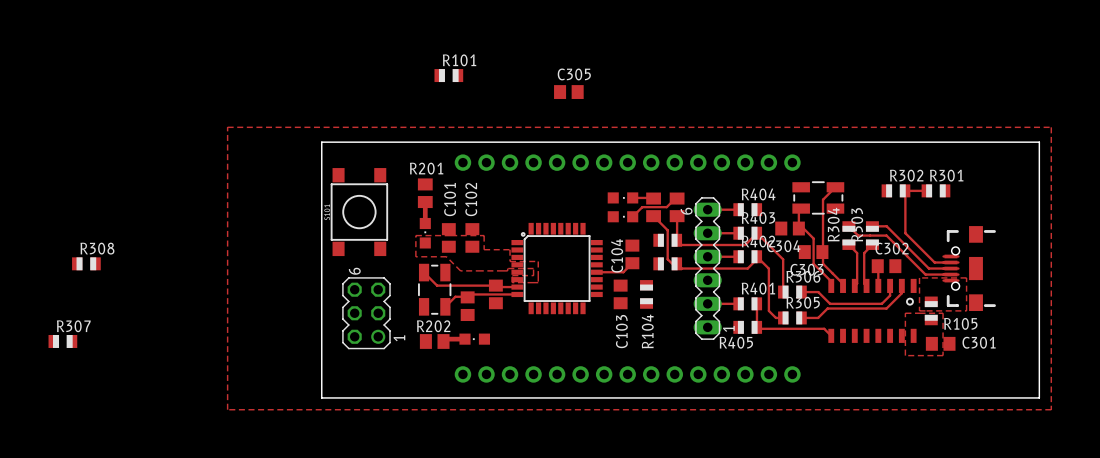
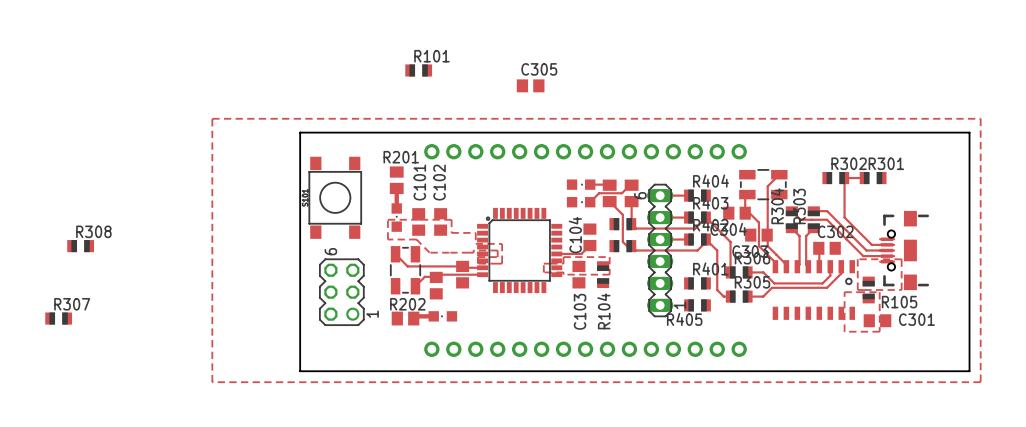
top zone outline: none -> (563, 257) (563, 263) (543, 263) (543, 272) (563, 272) (563, 274) (609, 274) (609, 257) (563, 257)
top track: (707, 303) (738, 303) -> none
top track: (756, 303) (758, 328) (824, 328) (831, 335) -> none

